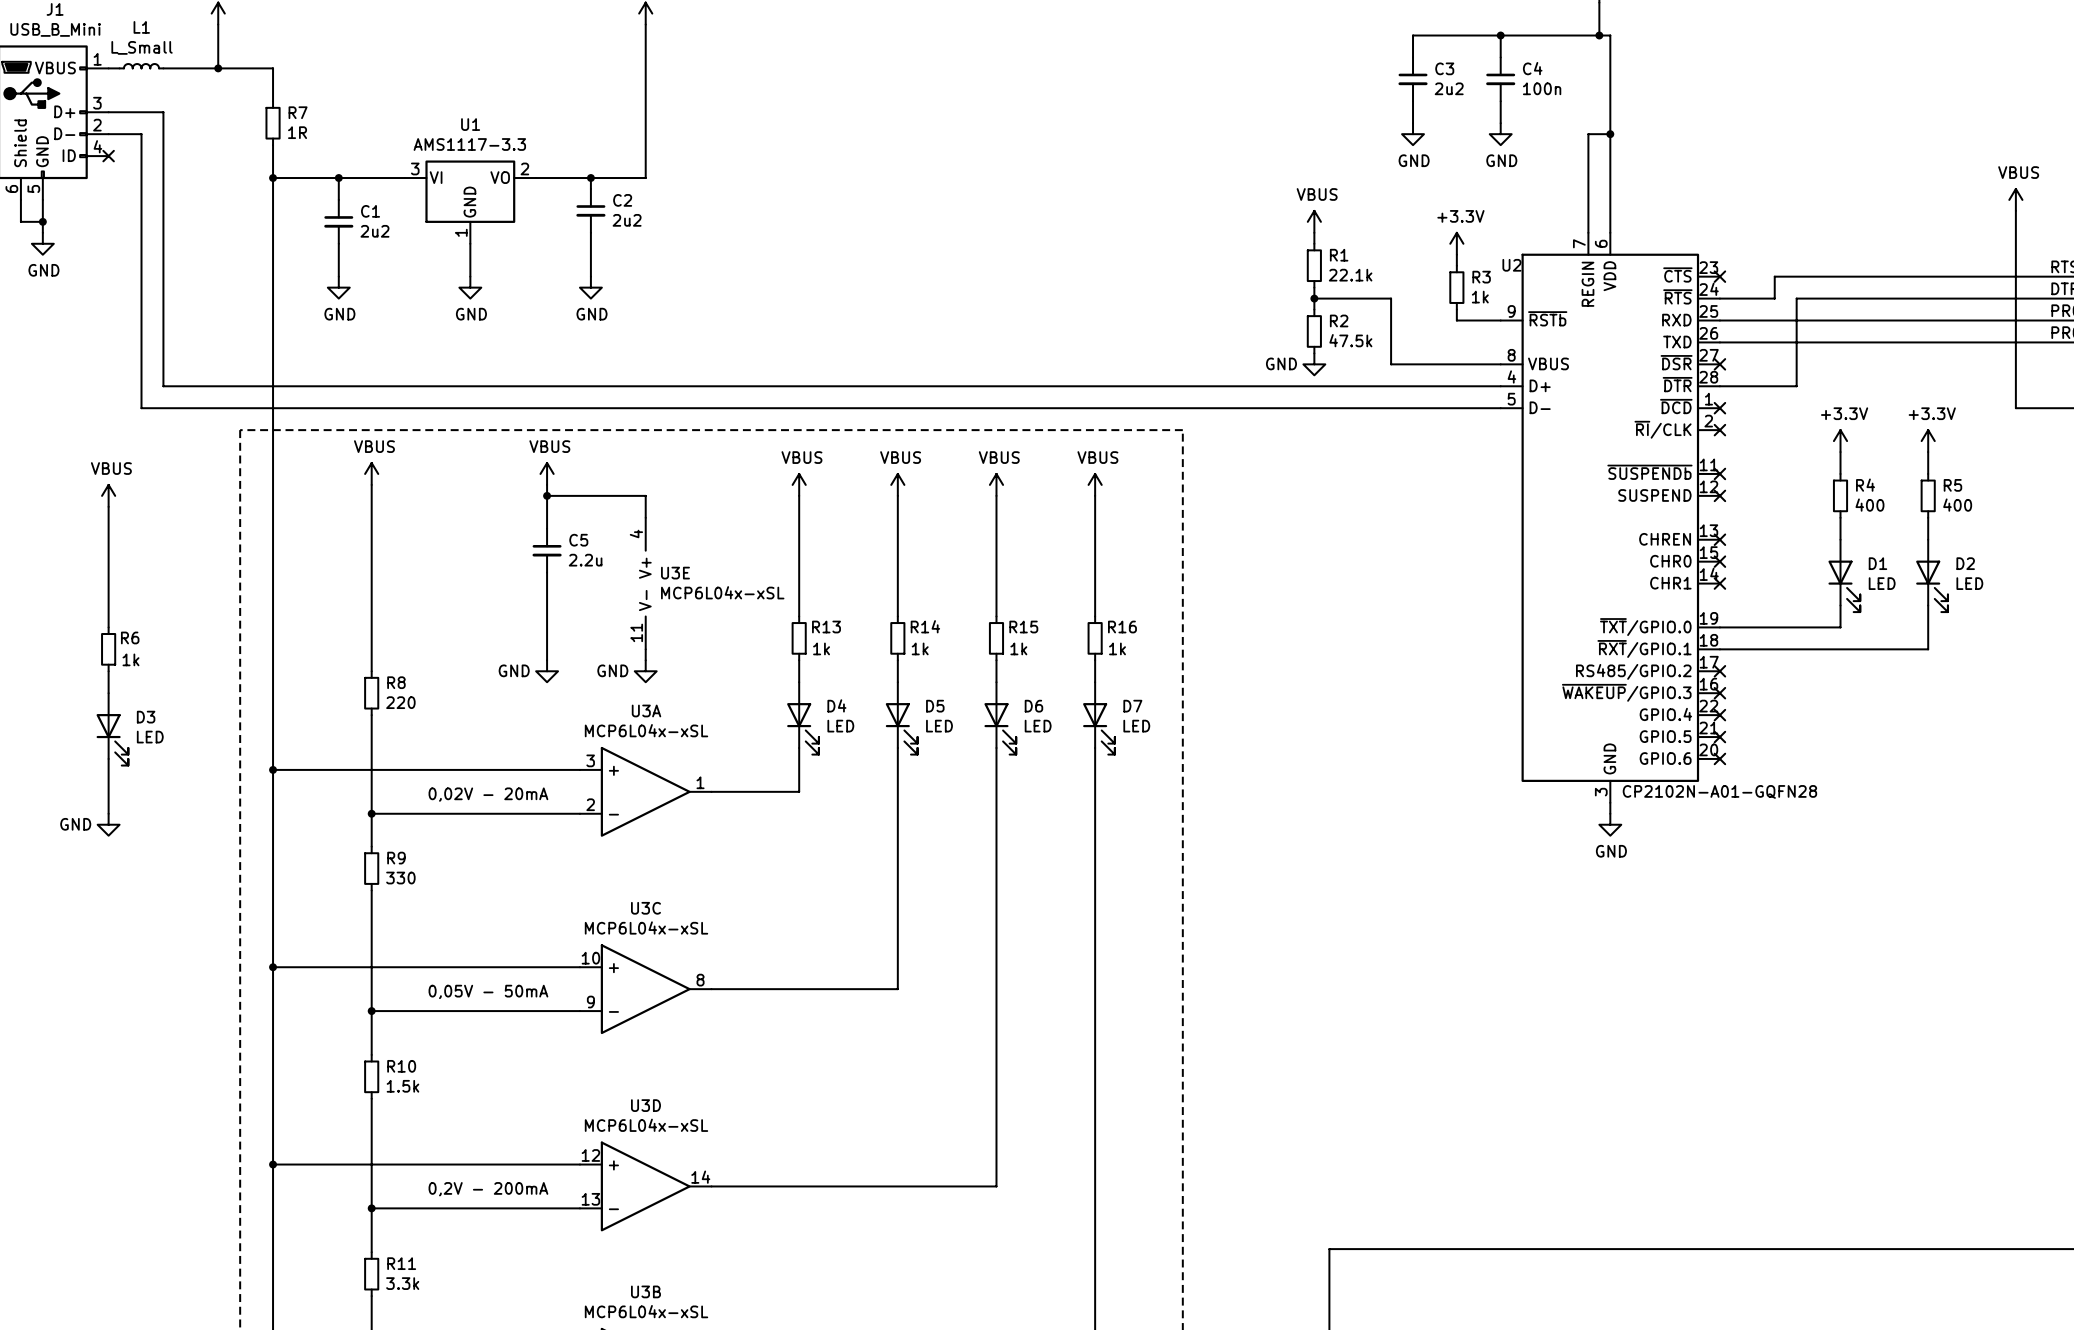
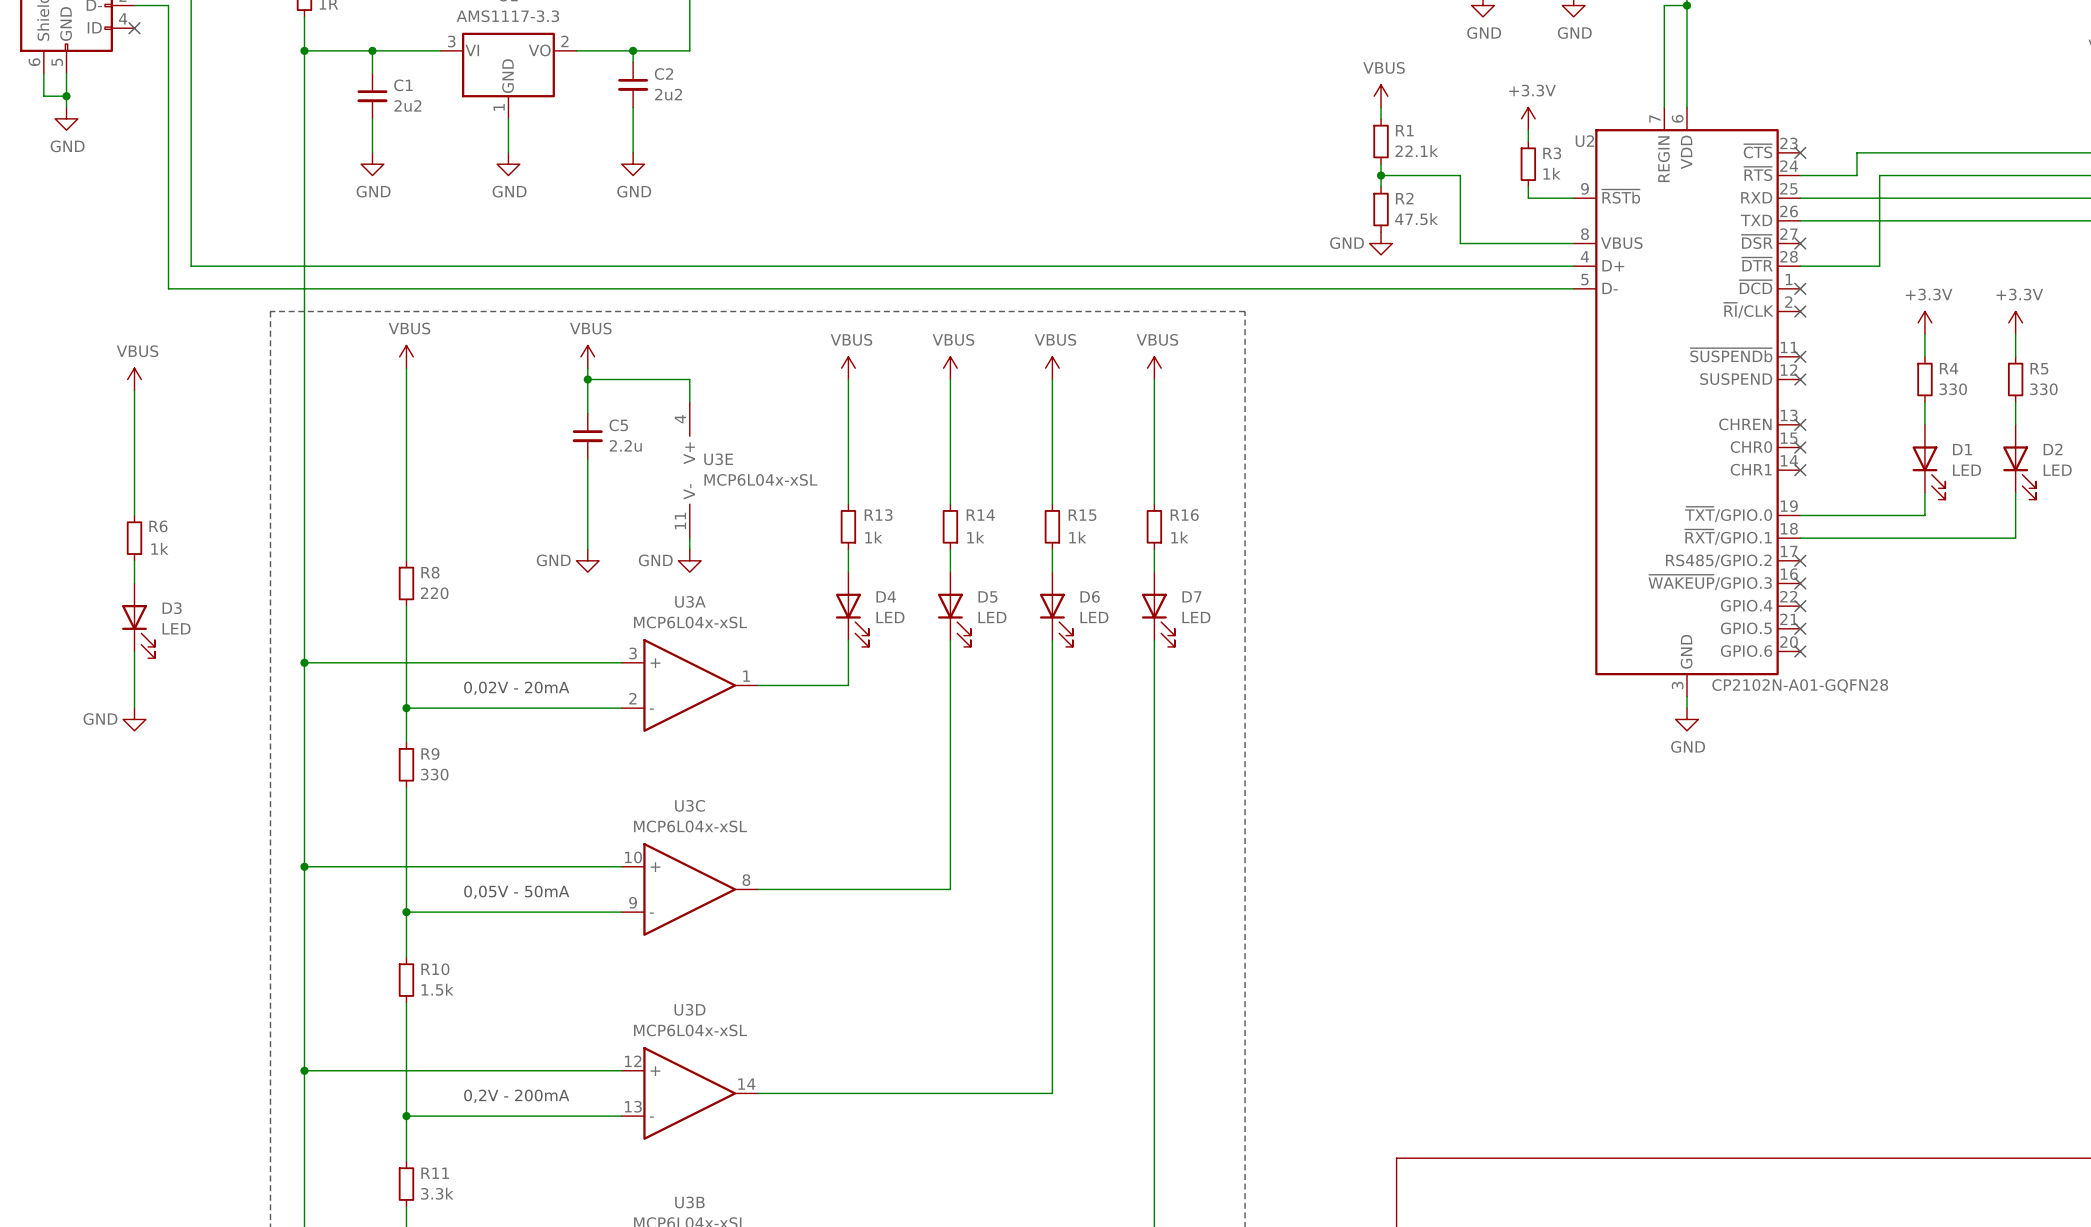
R4 value: 400 (1869, 505) -> 330 (1953, 389)
R5 value: 400 (1957, 505) -> 330 (2043, 389)

